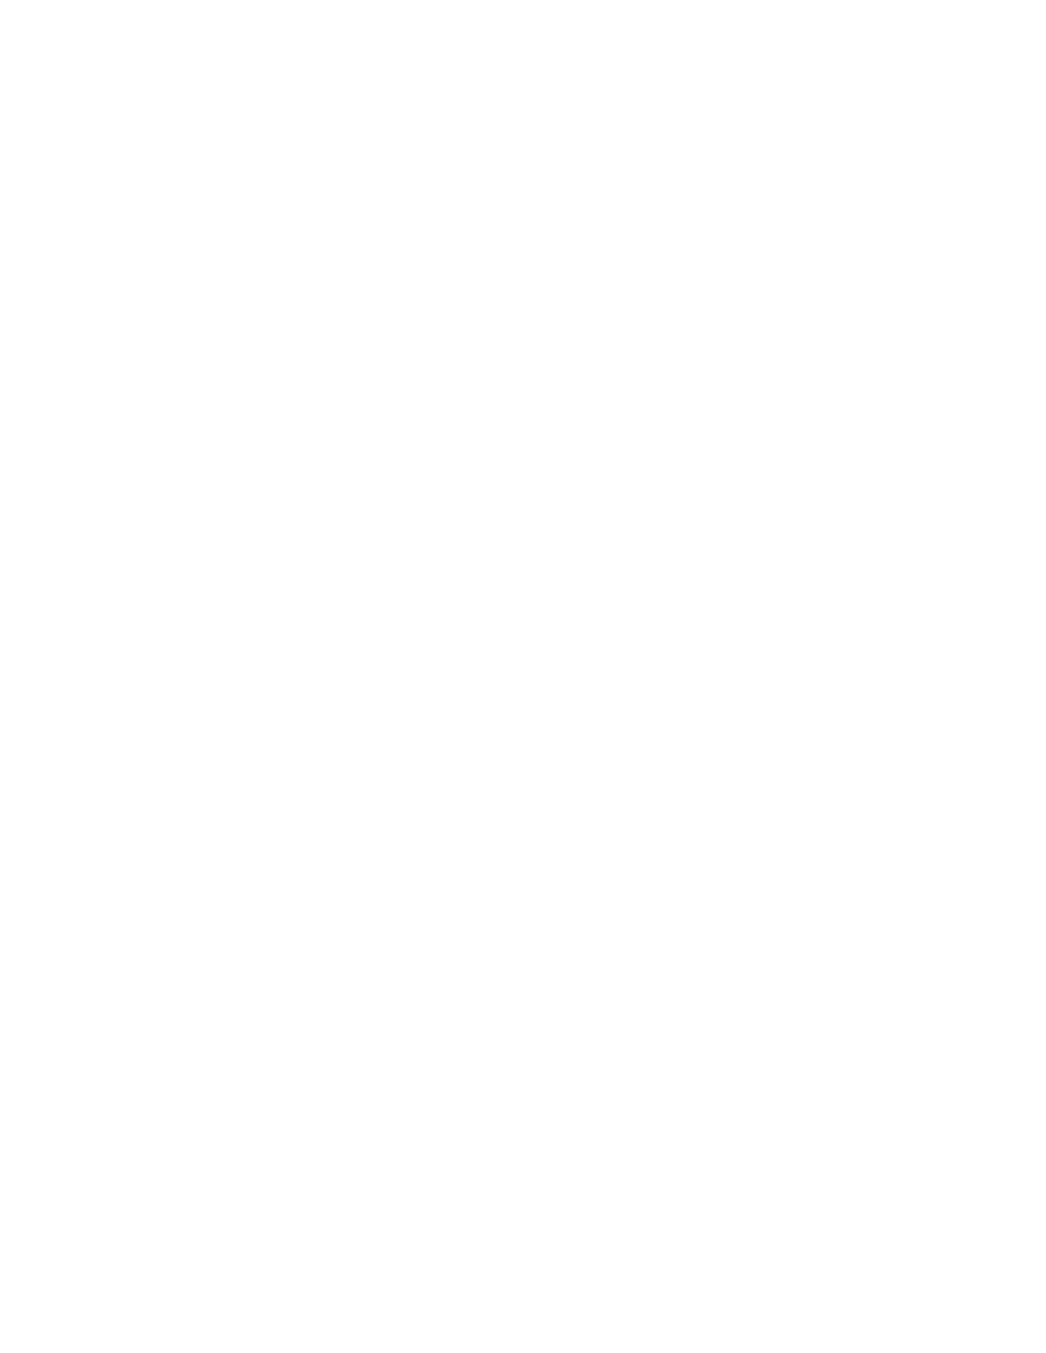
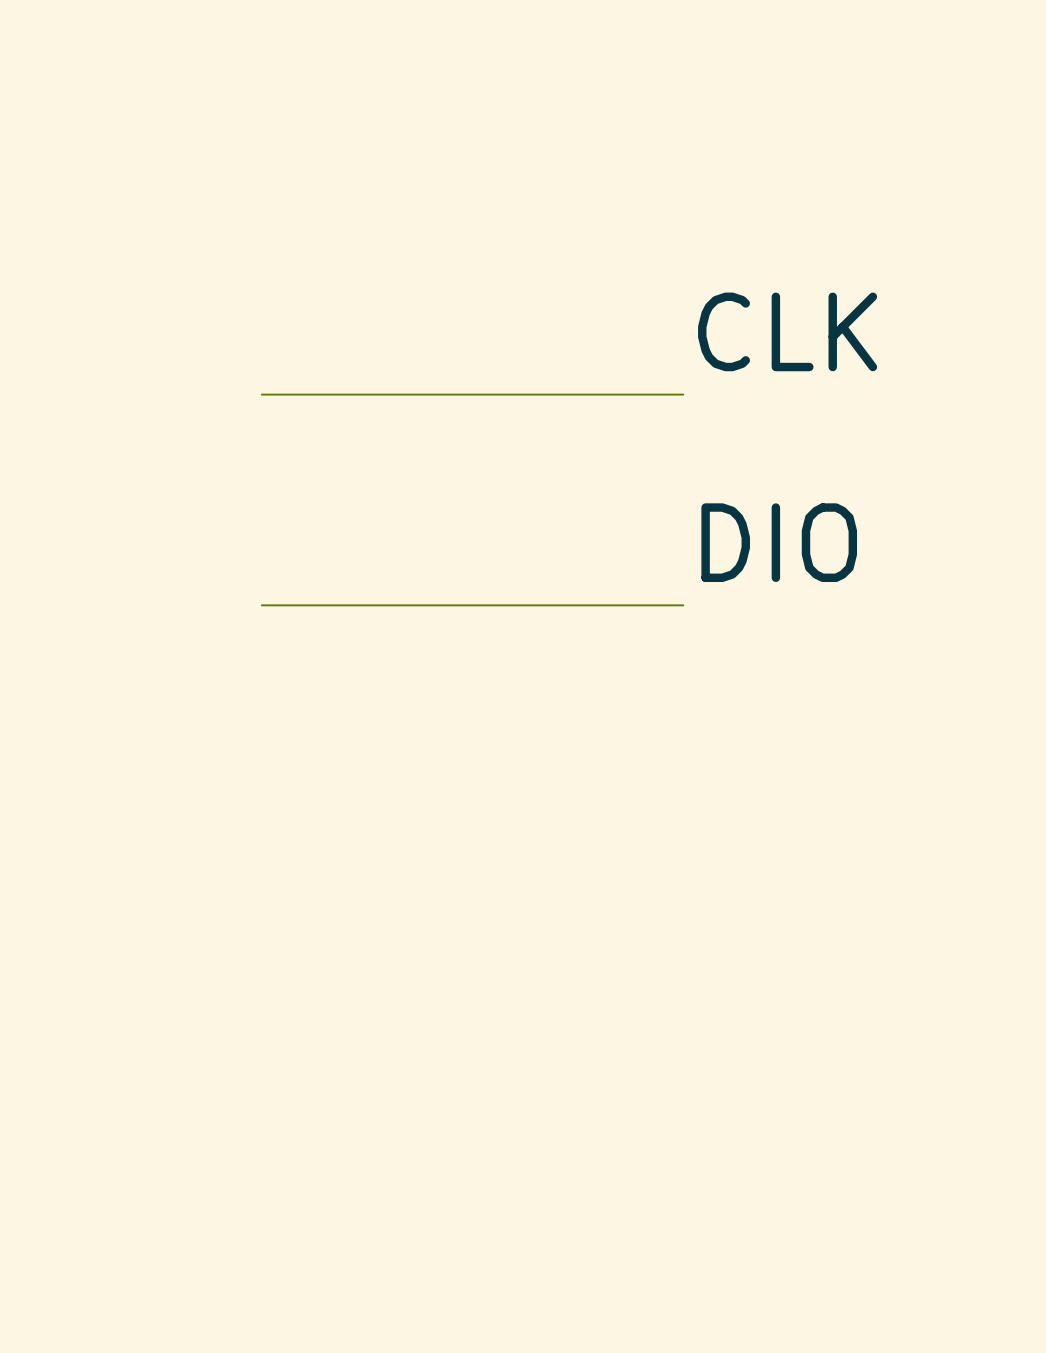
label: none -> CLK (787, 331)
wire: none -> (261, 394) (683, 394)
label: none -> DIO (779, 542)
wire: none -> (261, 605) (683, 605)

